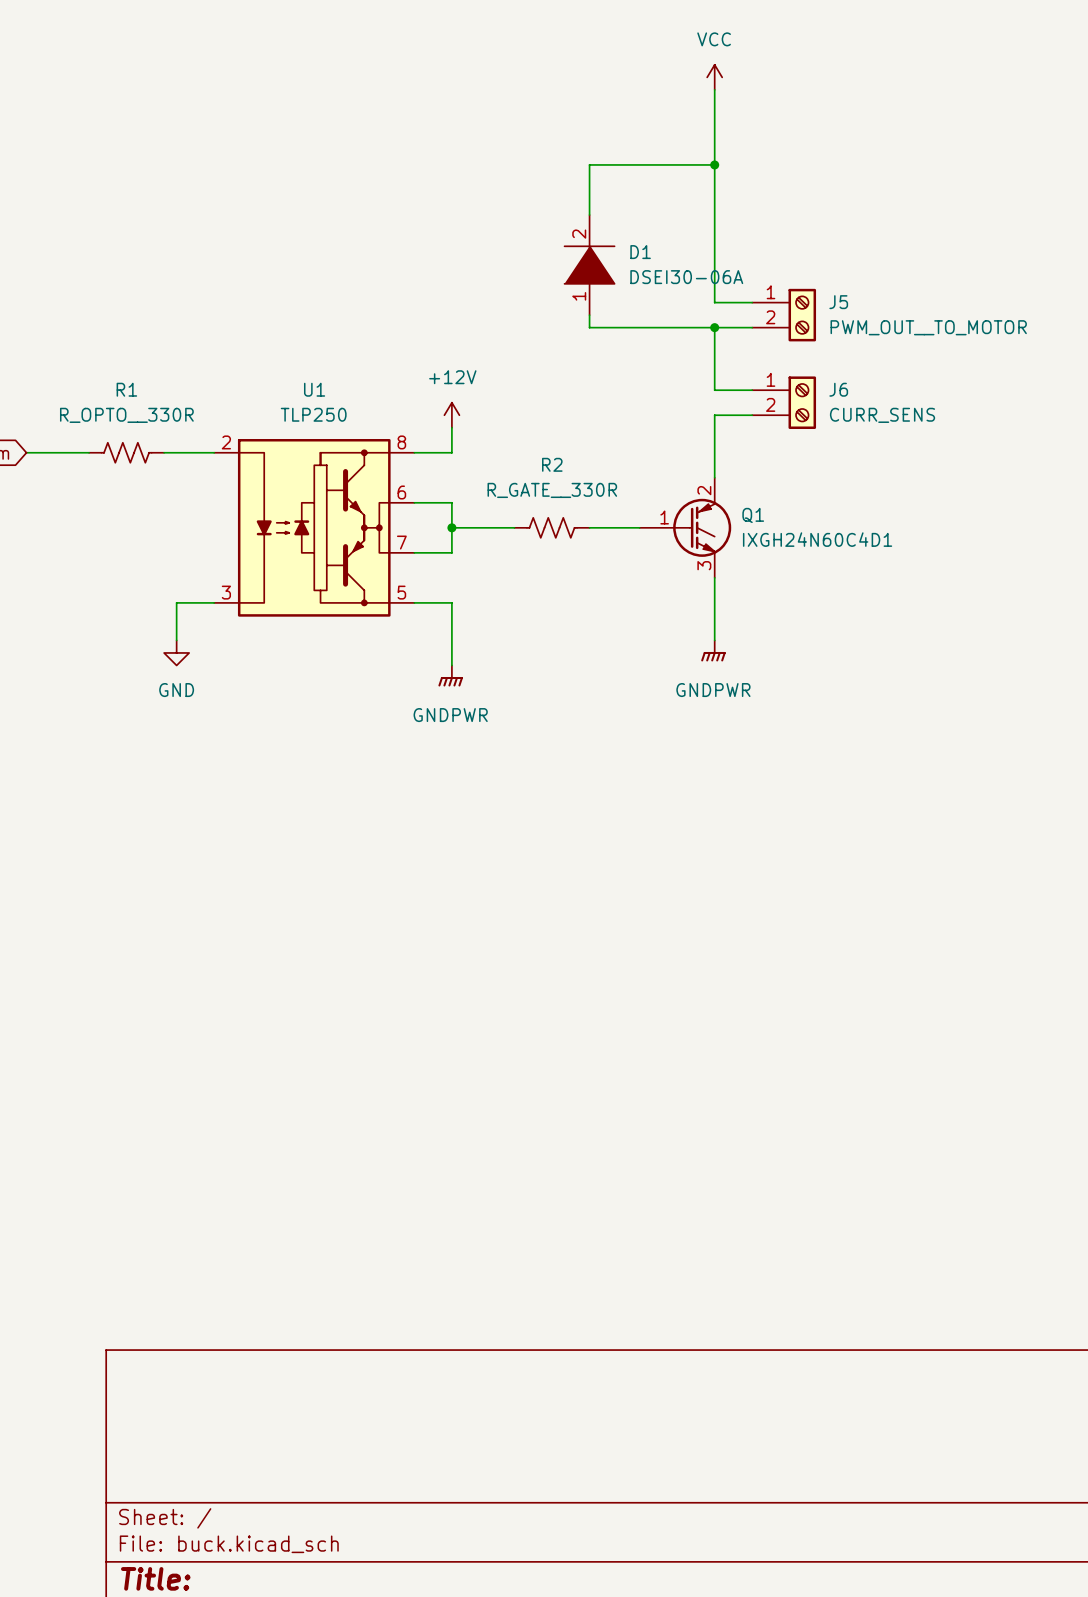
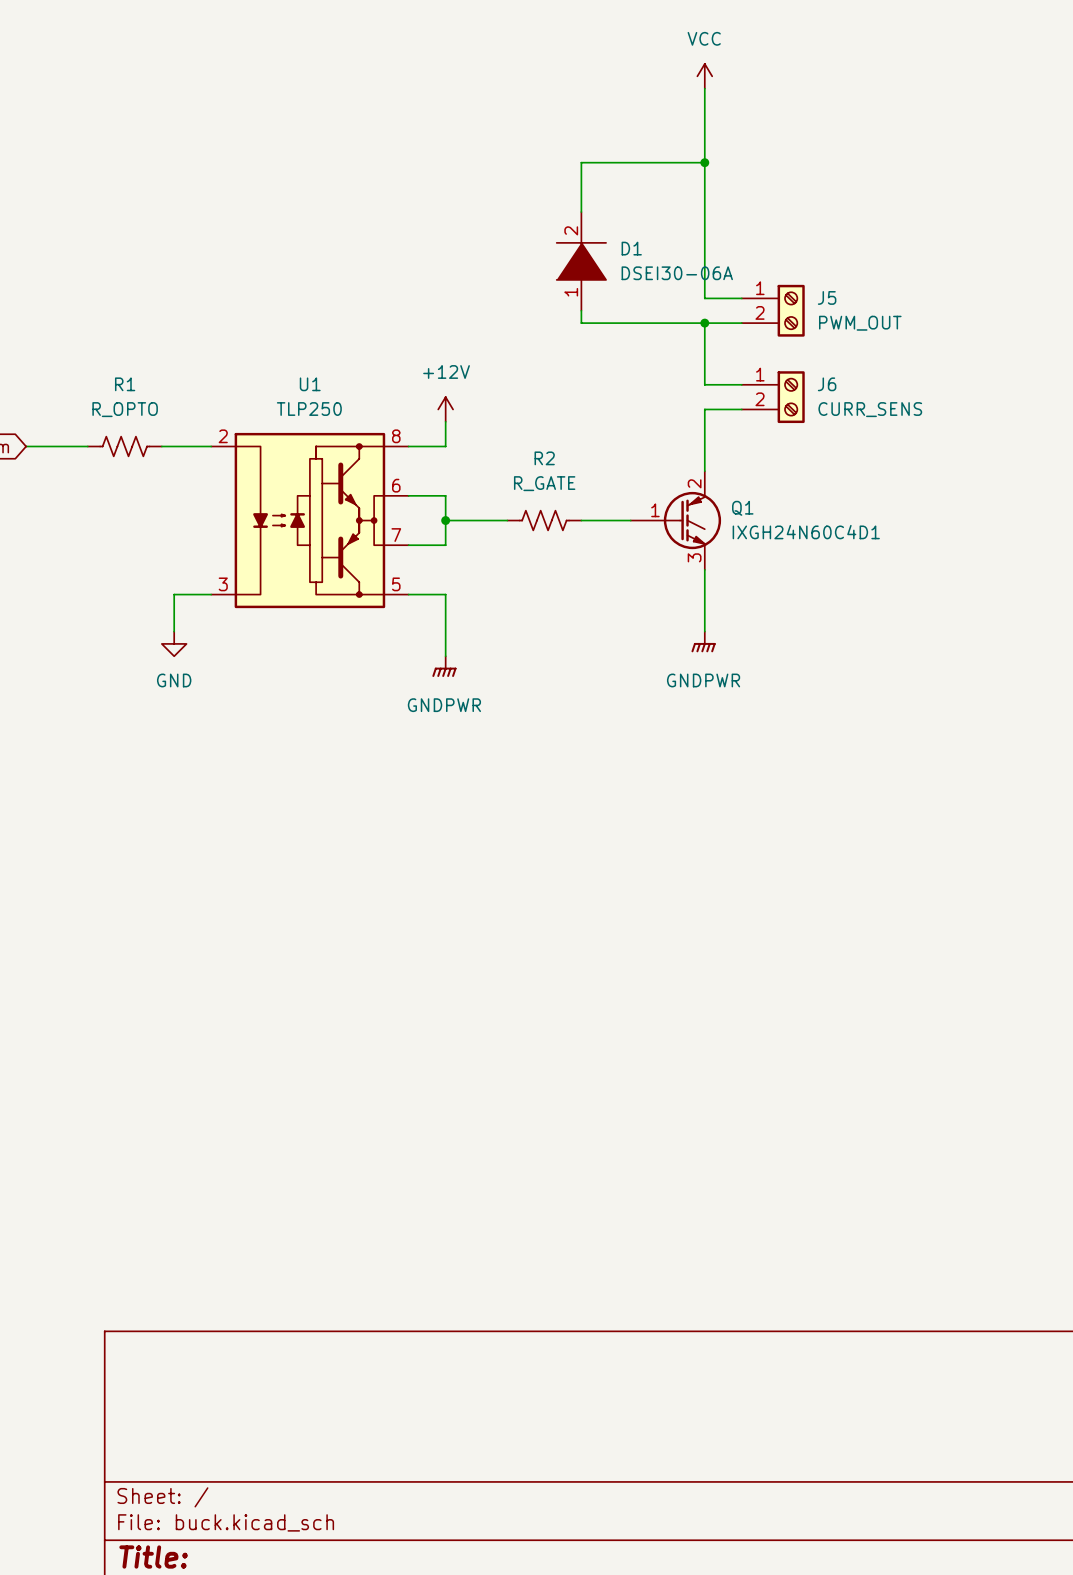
J5 value: PWM_OUT__TO_MOTOR (928, 327) -> PWM_OUT (860, 323)
R1 value: R_OPTO__330R (126, 415) -> R_OPTO (125, 409)
R2 value: R_GATE__330R (552, 490) -> R_GATE (544, 483)

